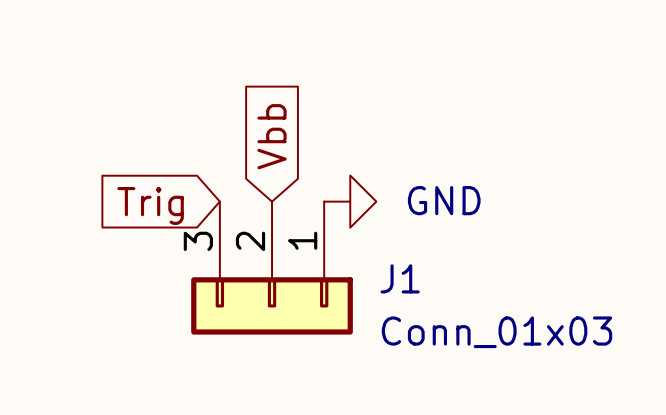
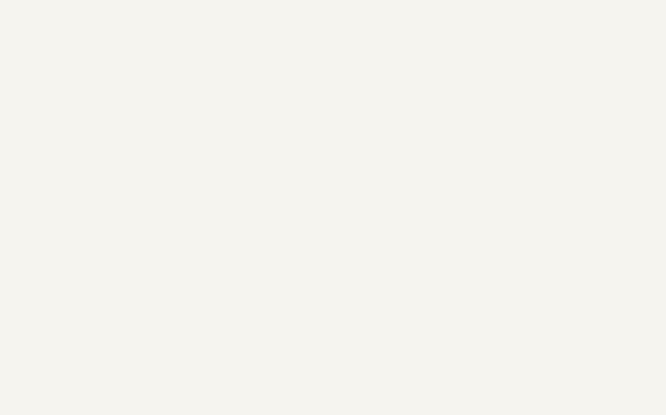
global label: Vbb (272, 136) -> none
power symbol: GND (350, 201) -> none
global label: Trig (150, 205) -> none
J1: Conn_01x03 (272, 268) -> none

